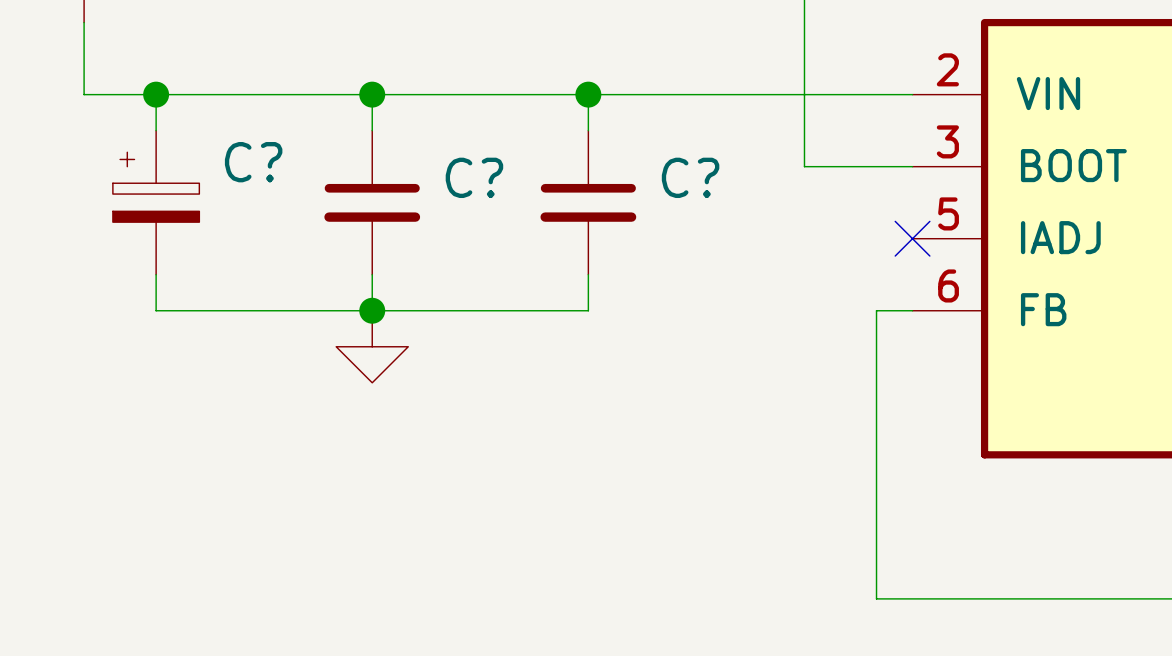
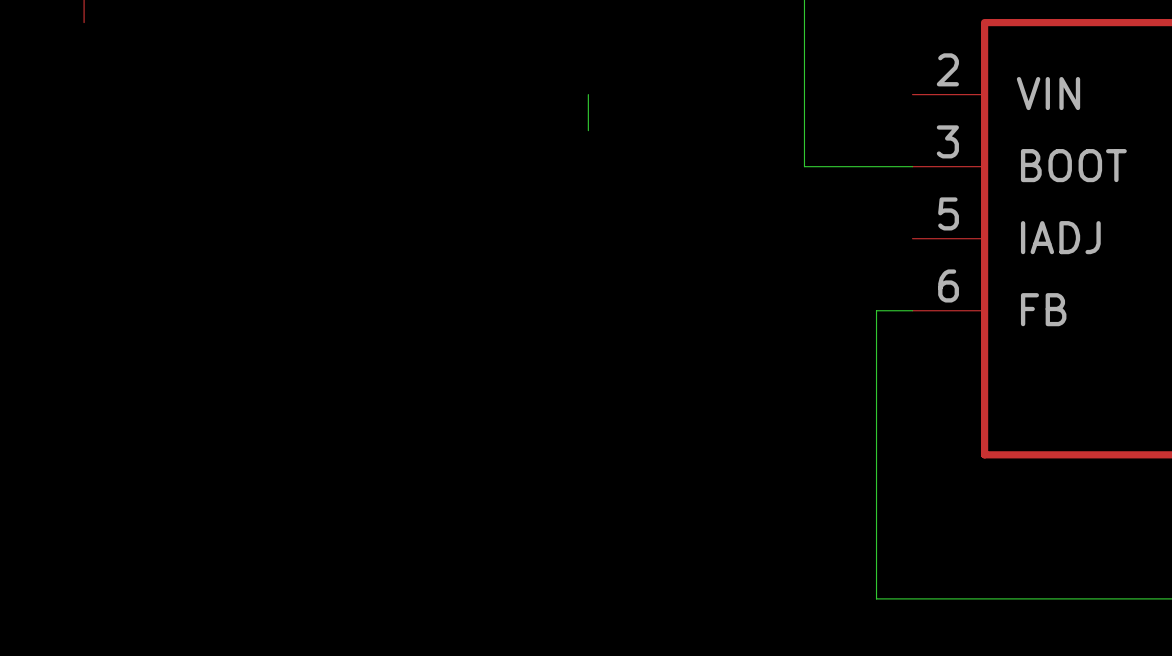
wire: (84, 22) (84, 94) (912, 94) -> none
wire: (156, 94) (156, 130) -> none
junction: (156, 94) -> none
wire: (372, 94) (372, 130) -> none
junction: (372, 94) -> none
junction: (588, 94) -> none
C?: (156, 202) -> none
C?: (372, 202) -> none
C?: (588, 202) -> none
no-connect mark: (912, 238) -> none
wire: (156, 274) (156, 310) (588, 310) (588, 274) -> none
wire: (372, 274) (372, 310) -> none
junction: (372, 310) -> none
power symbol: (372, 346) -> none

